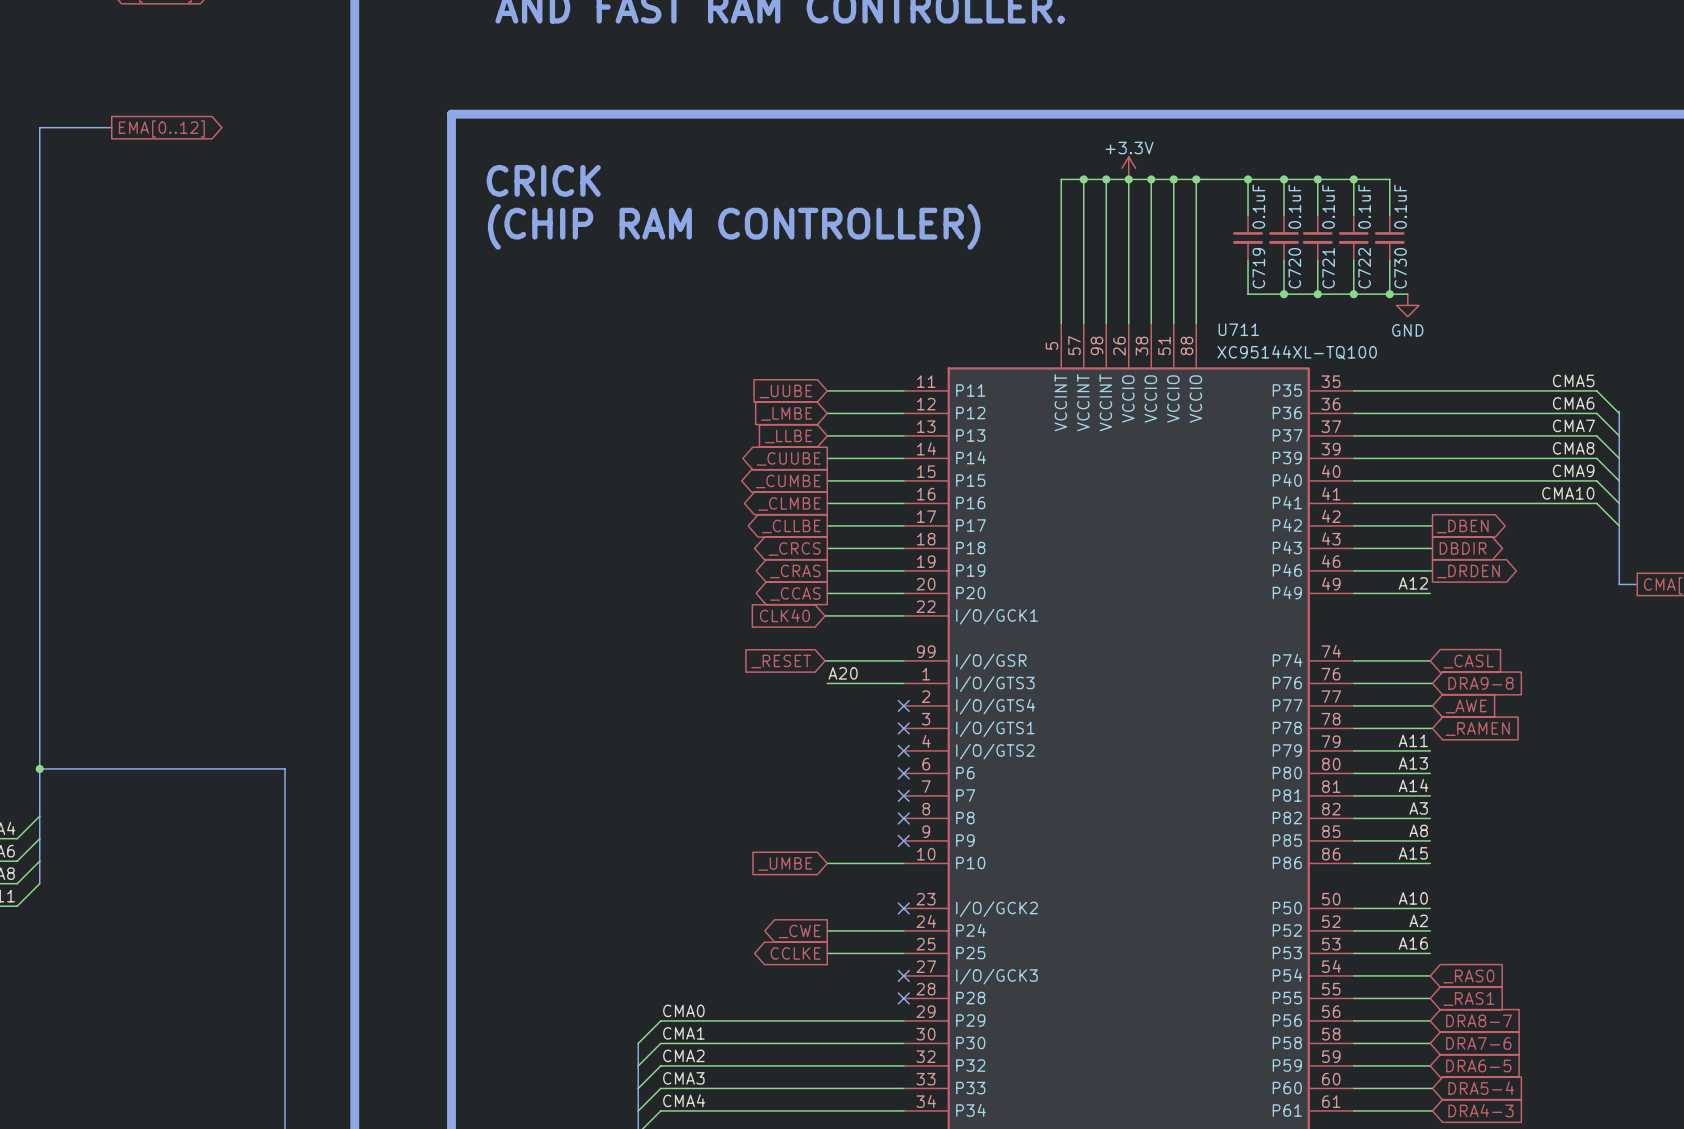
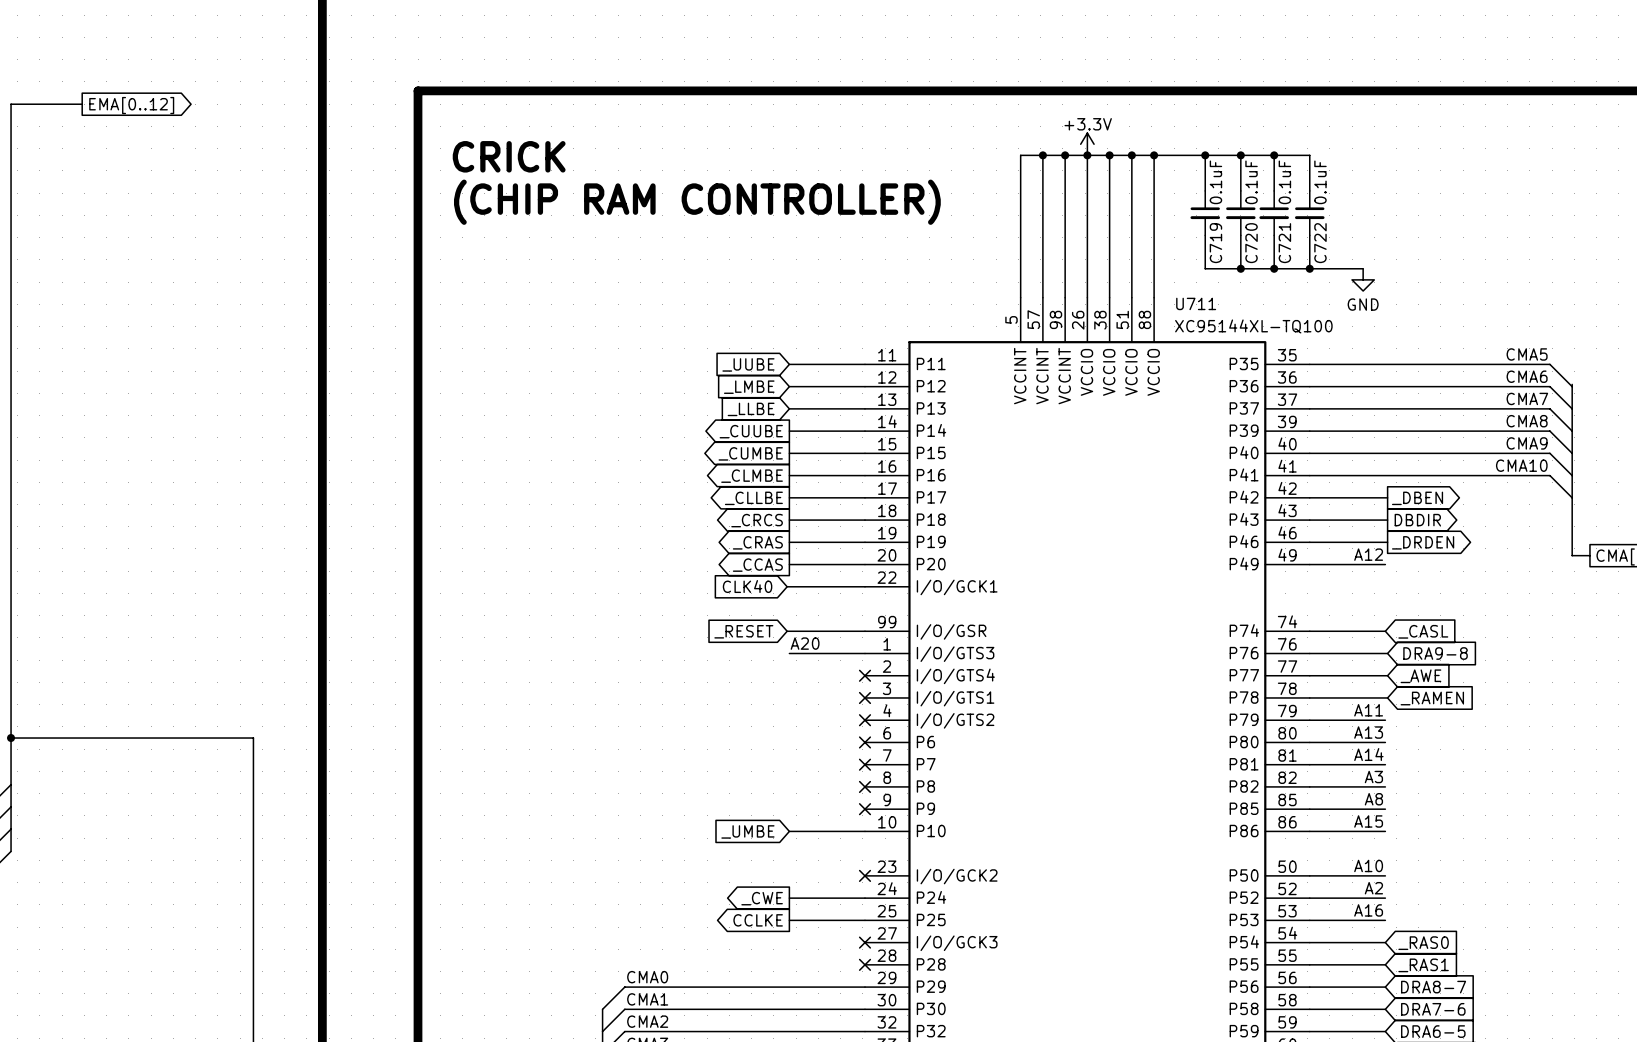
wire: (1353, 179) (1389, 179) (1389, 215) -> none
junction: (1353, 179) -> none
C730: 0.1uF (1389, 237) -> none
wire: (1389, 260) (1389, 294) -> none
junction: (1389, 294) -> none

